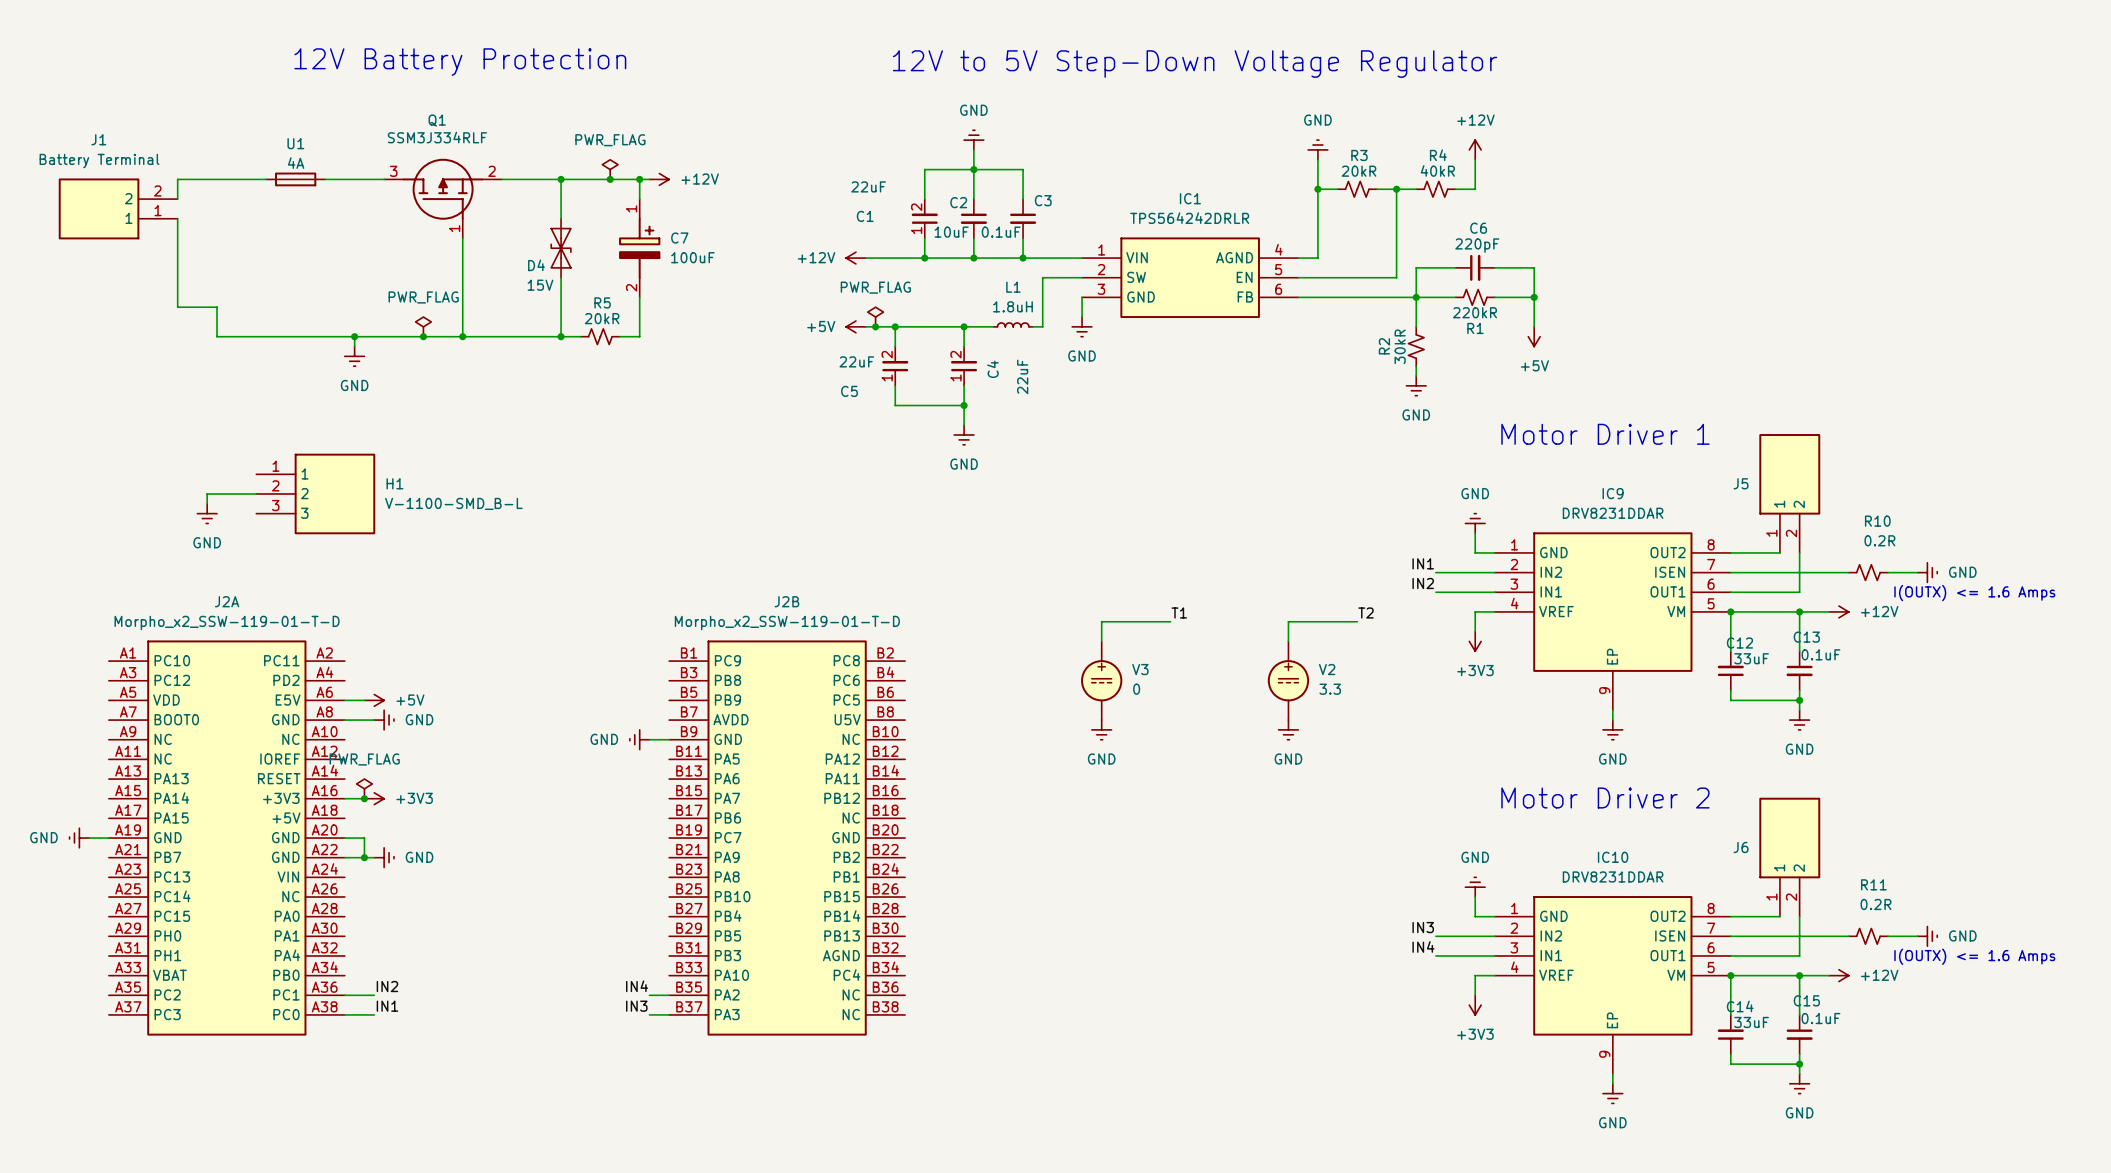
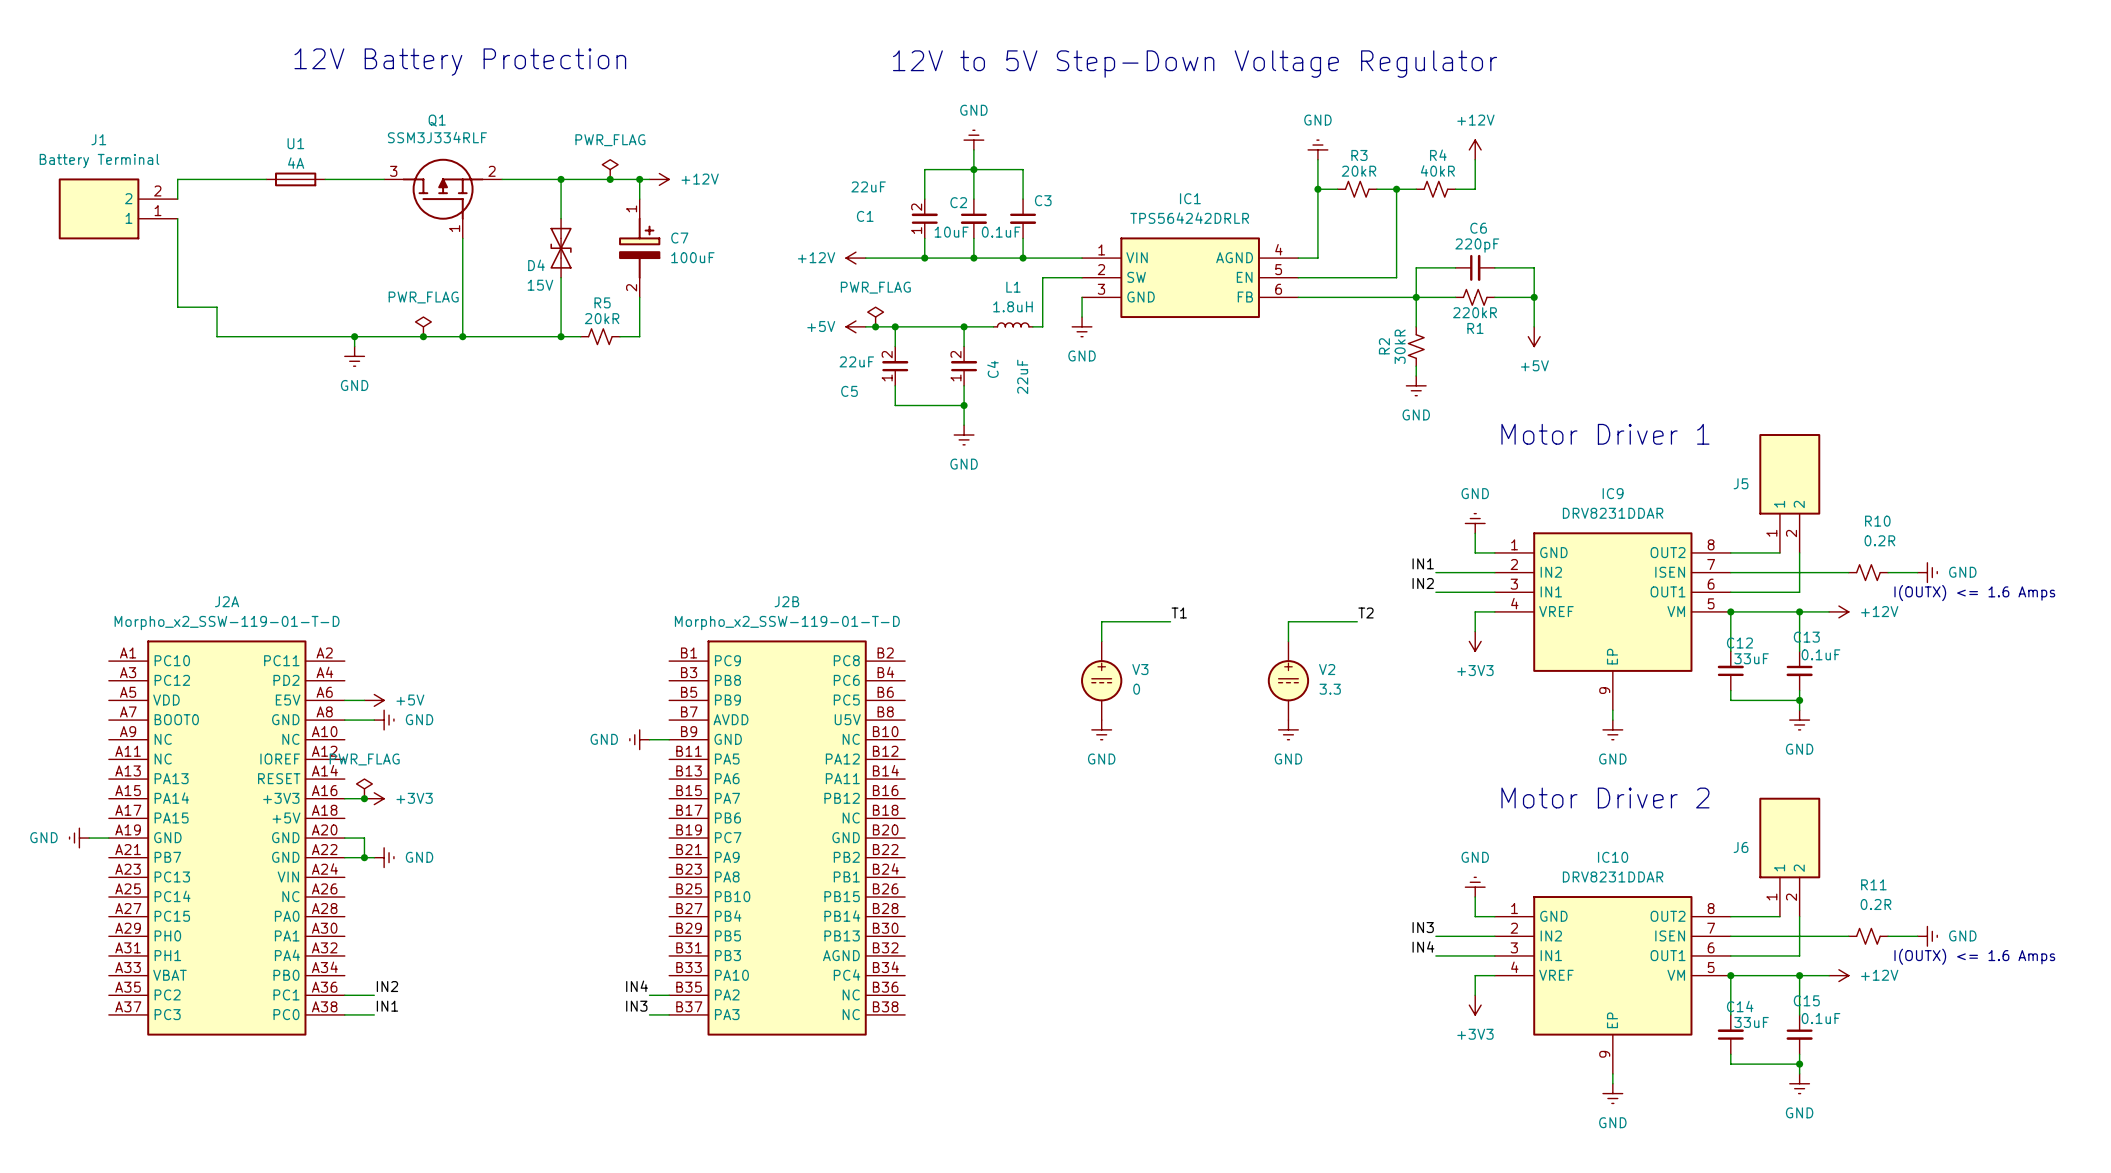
wire: (256, 493) (207, 493) (207, 503) -> none
H1: V-1100-SMD_B-L (315, 493) -> none
power symbol: GND (207, 513) -> none

